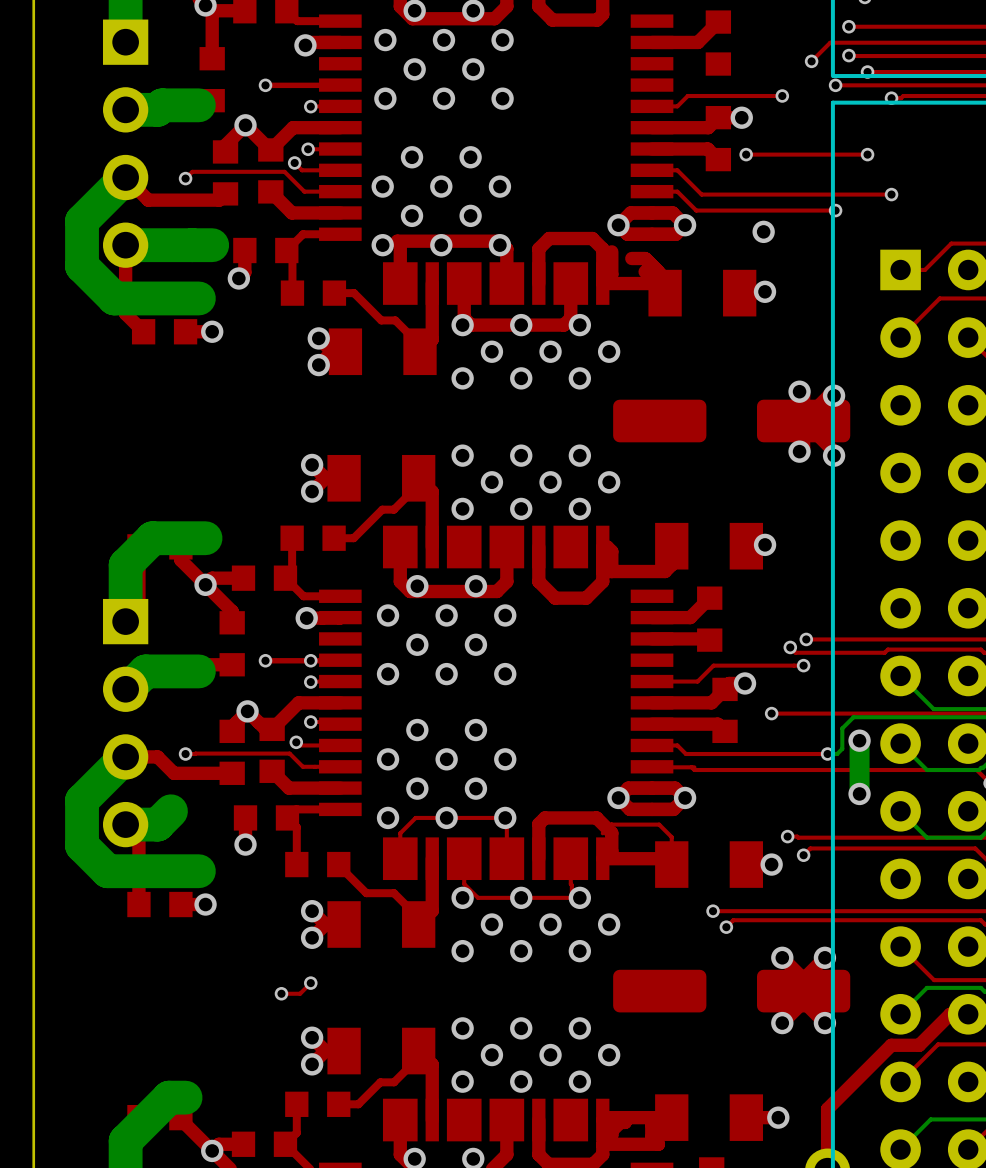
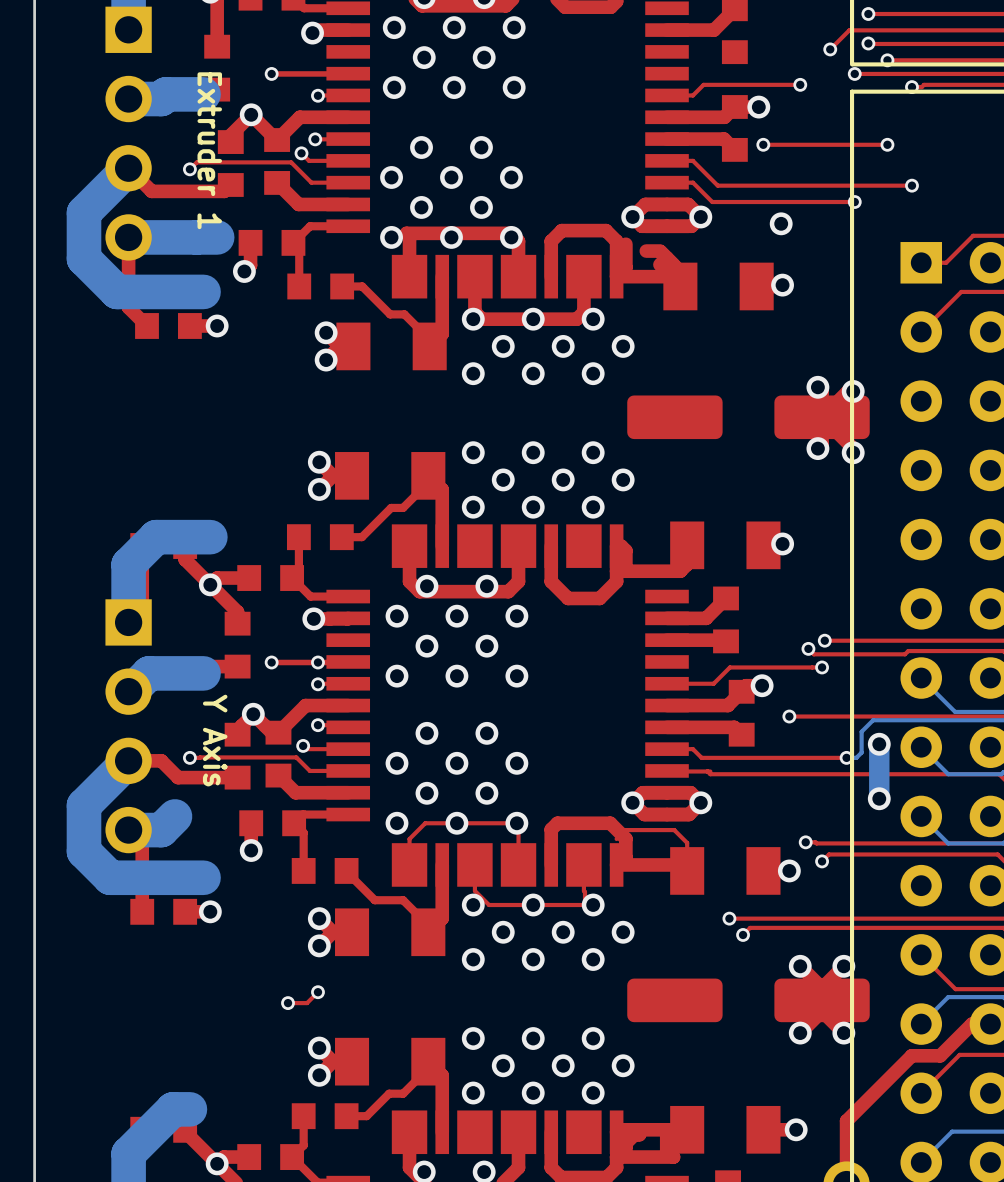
text: none -> Extruder 1 (209, 150)
text: none -> Y Axis (215, 740)

